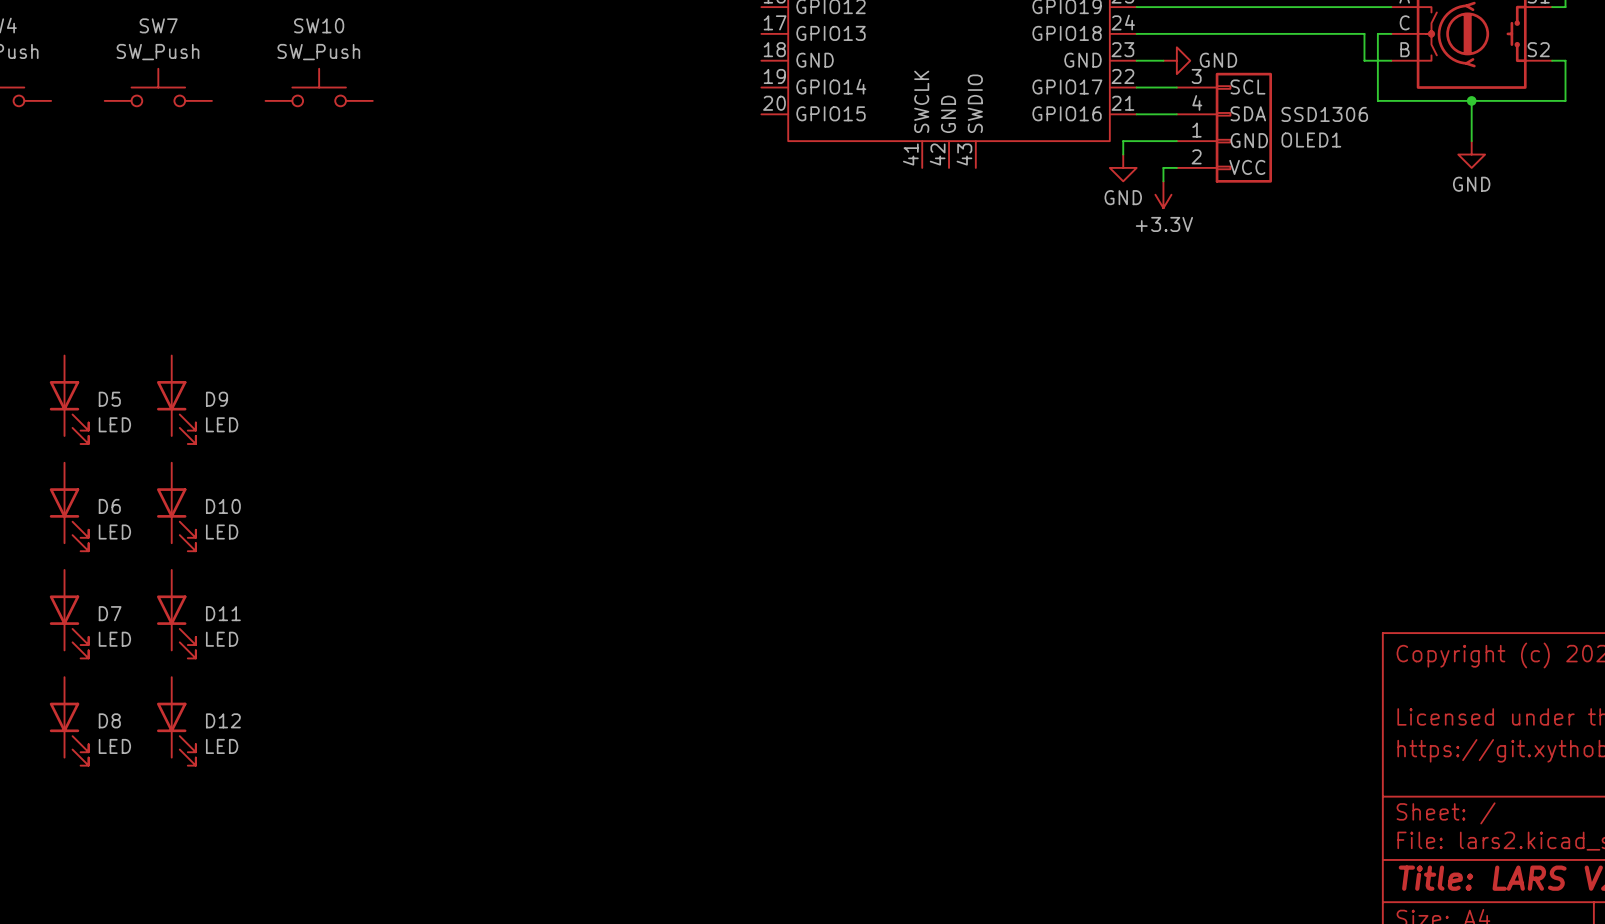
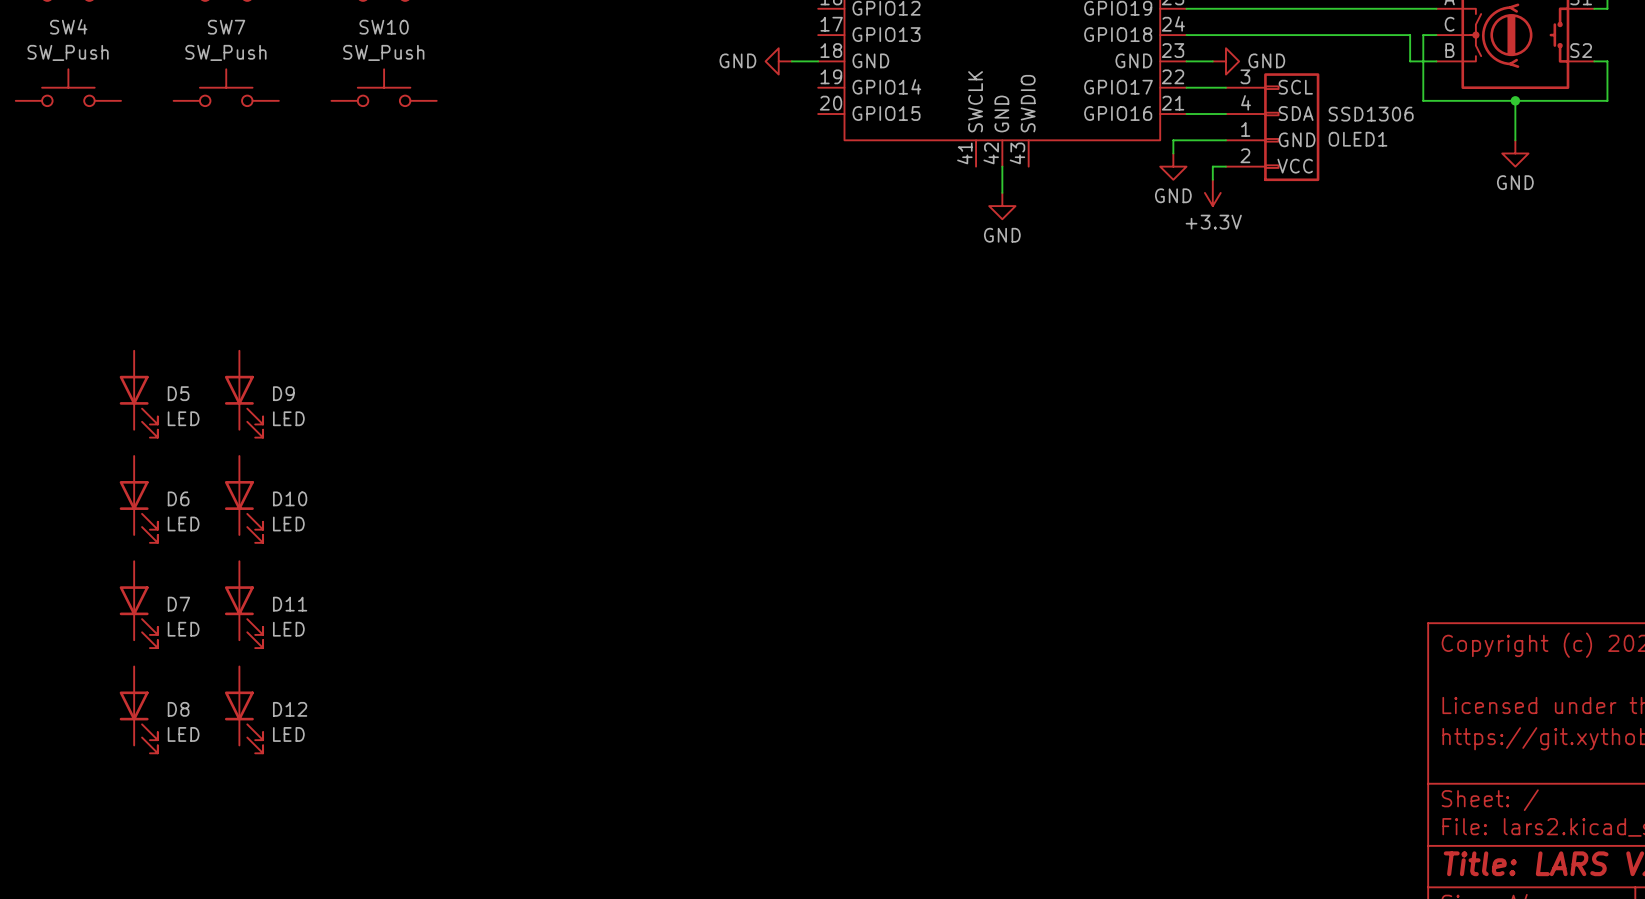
power symbol: none -> GND (778, 61)
wire: none -> (791, 61) (818, 61)
wire: none -> (1002, 166) (1002, 192)
power symbol: none -> GND (1002, 206)

